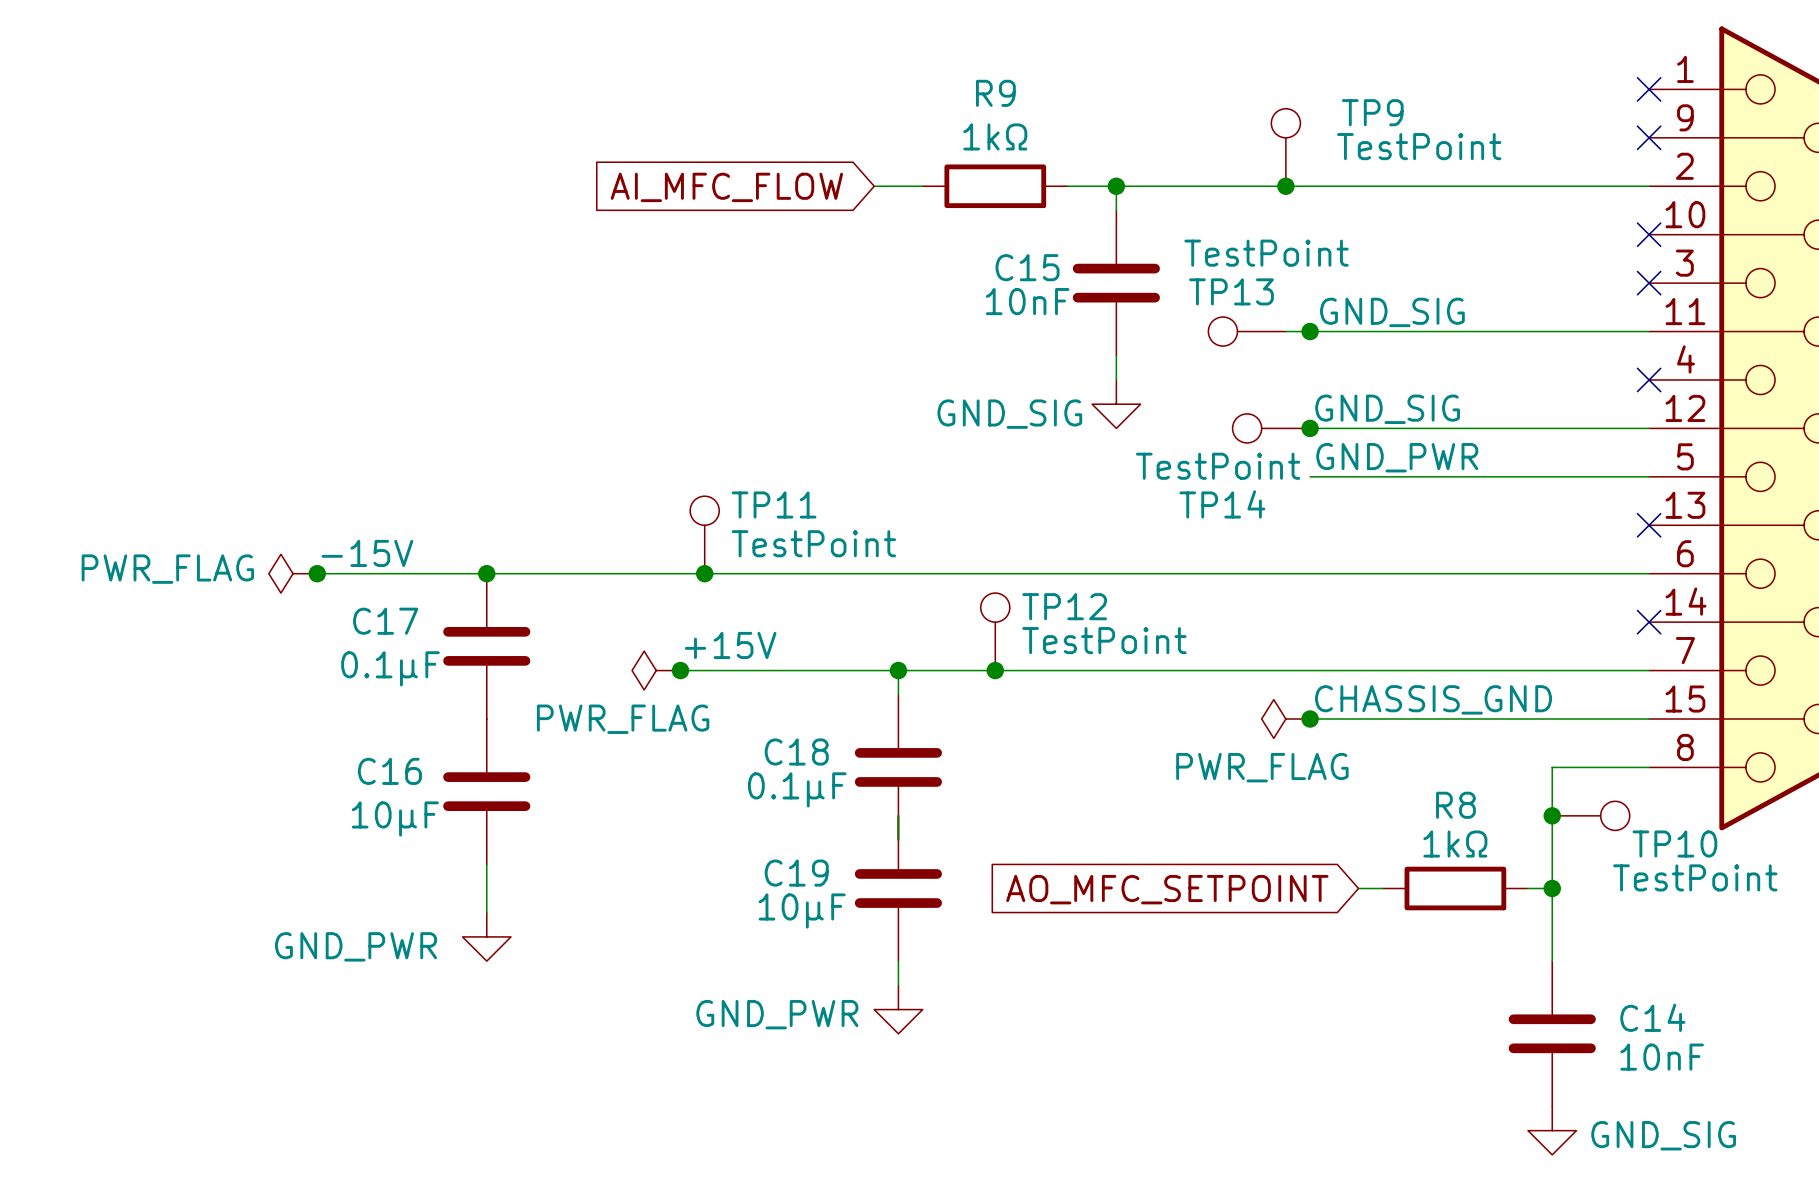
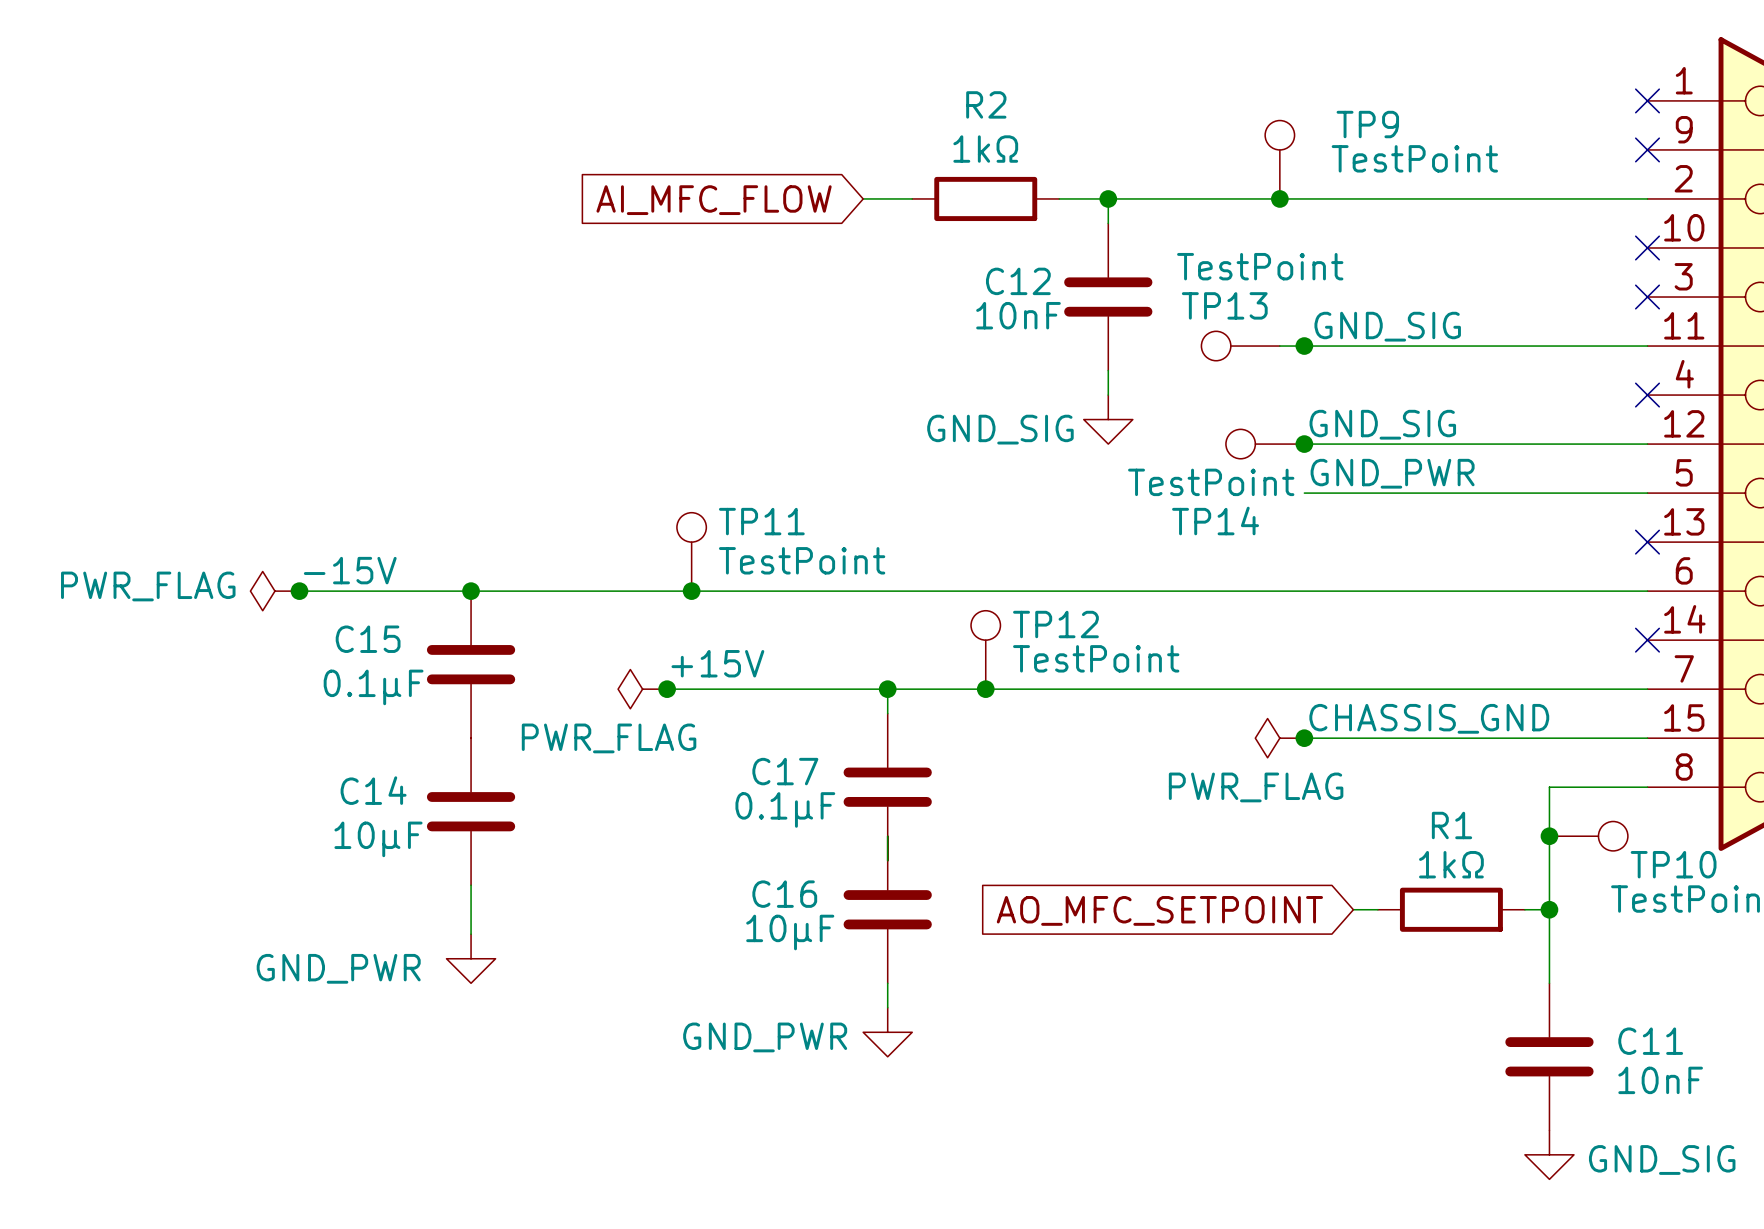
R9 name: R9 (995, 93) -> R2 (986, 104)
C15 name: C15 (1027, 267) -> C12 (1018, 281)
C17 name: C17 (385, 621) -> C15 (368, 639)
C18 name: C18 (796, 751) -> C17 (785, 771)
C16 name: C16 (389, 771) -> C14 (373, 790)
R8 name: R8 (1455, 805) -> R1 (1452, 825)
C19 name: C19 (796, 873) -> C16 (784, 894)
C14 name: C14 (1652, 1017) -> C11 (1650, 1041)

